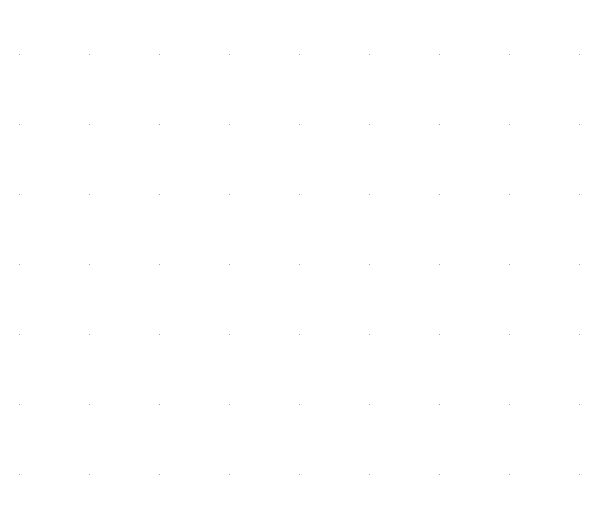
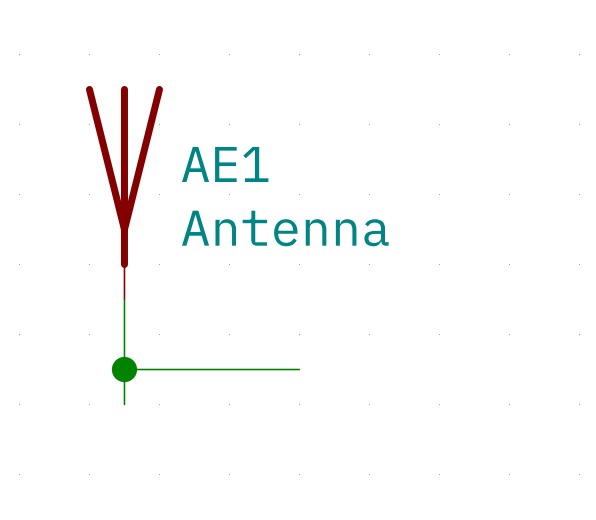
AE1: none -> Antenna (124, 192)
wire: none -> (124, 299) (124, 404)
wire: none -> (124, 369) (299, 369)
junction: none -> (124, 369)

